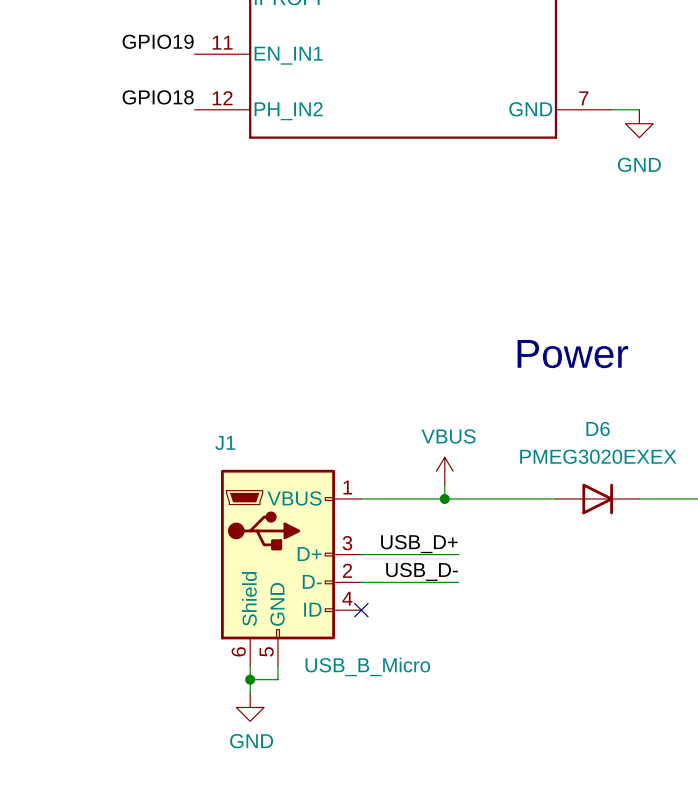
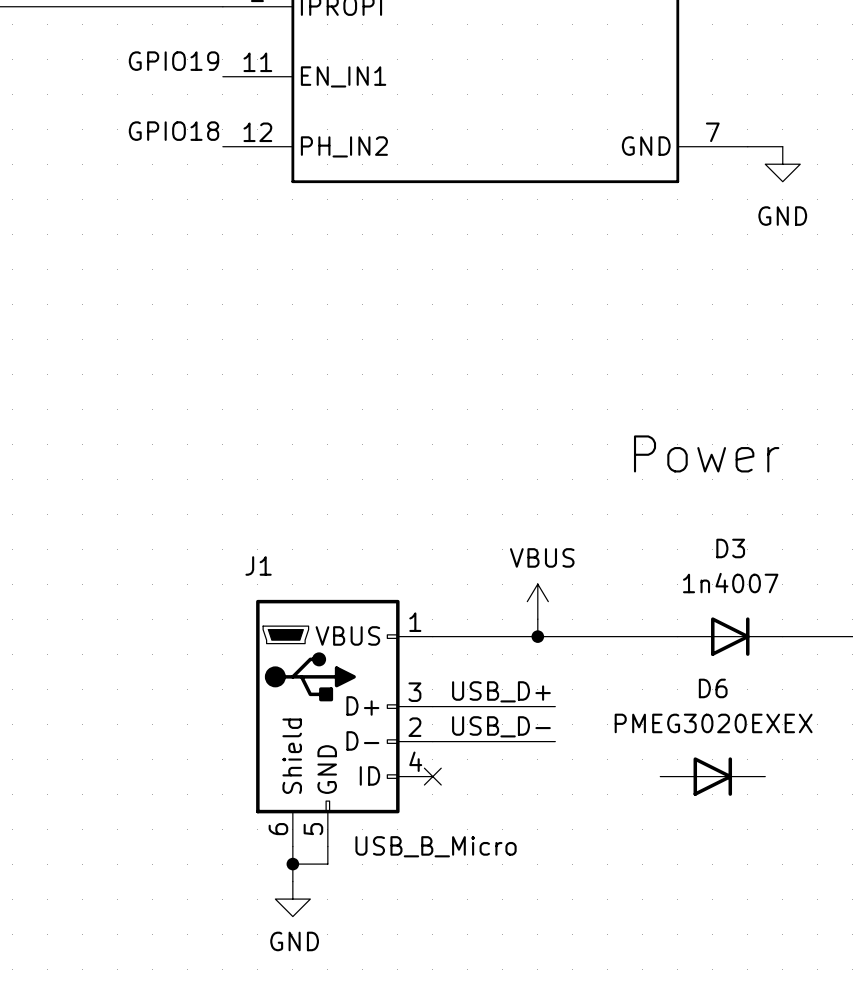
D6 name: D6 (598, 428) -> D3 (730, 548)
D6 value: PMEG3020EXEX (598, 456) -> 1n4007 (730, 583)
D6: none -> PMEG3020EXEX (712, 776)

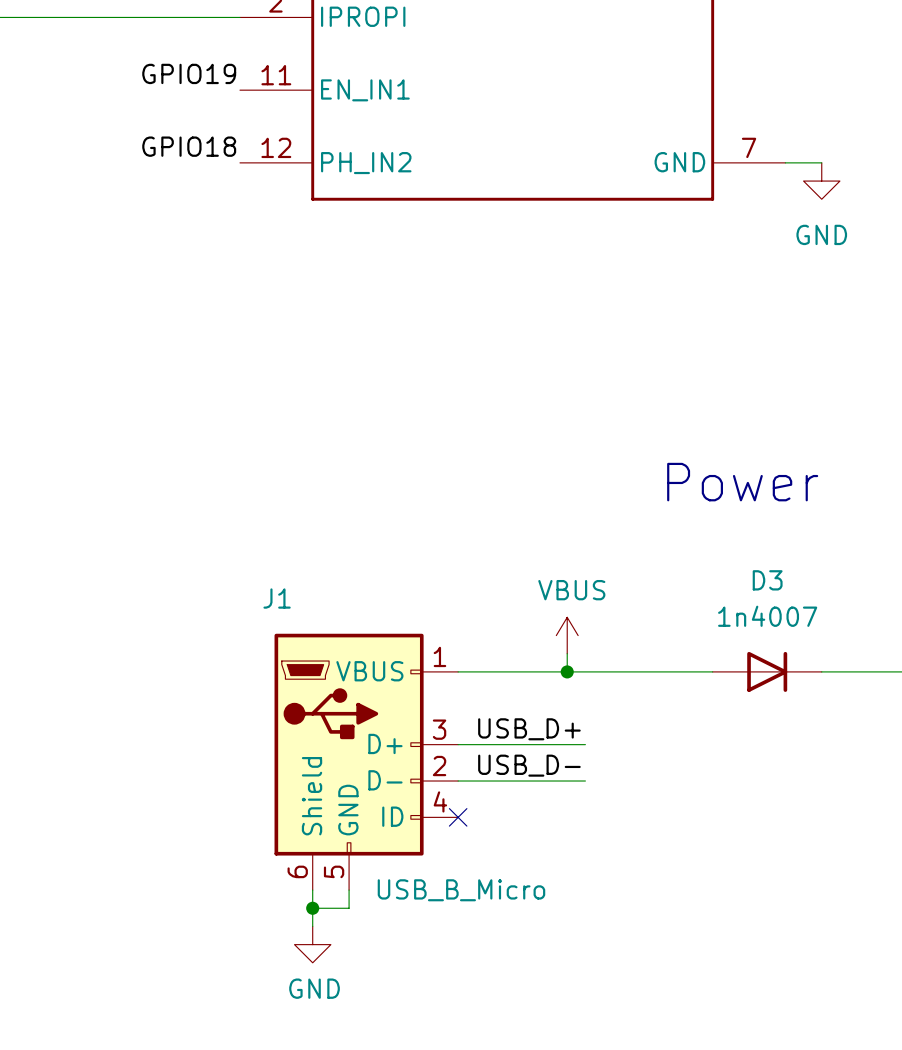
D6: PMEG3020EXEX (712, 776) -> none

